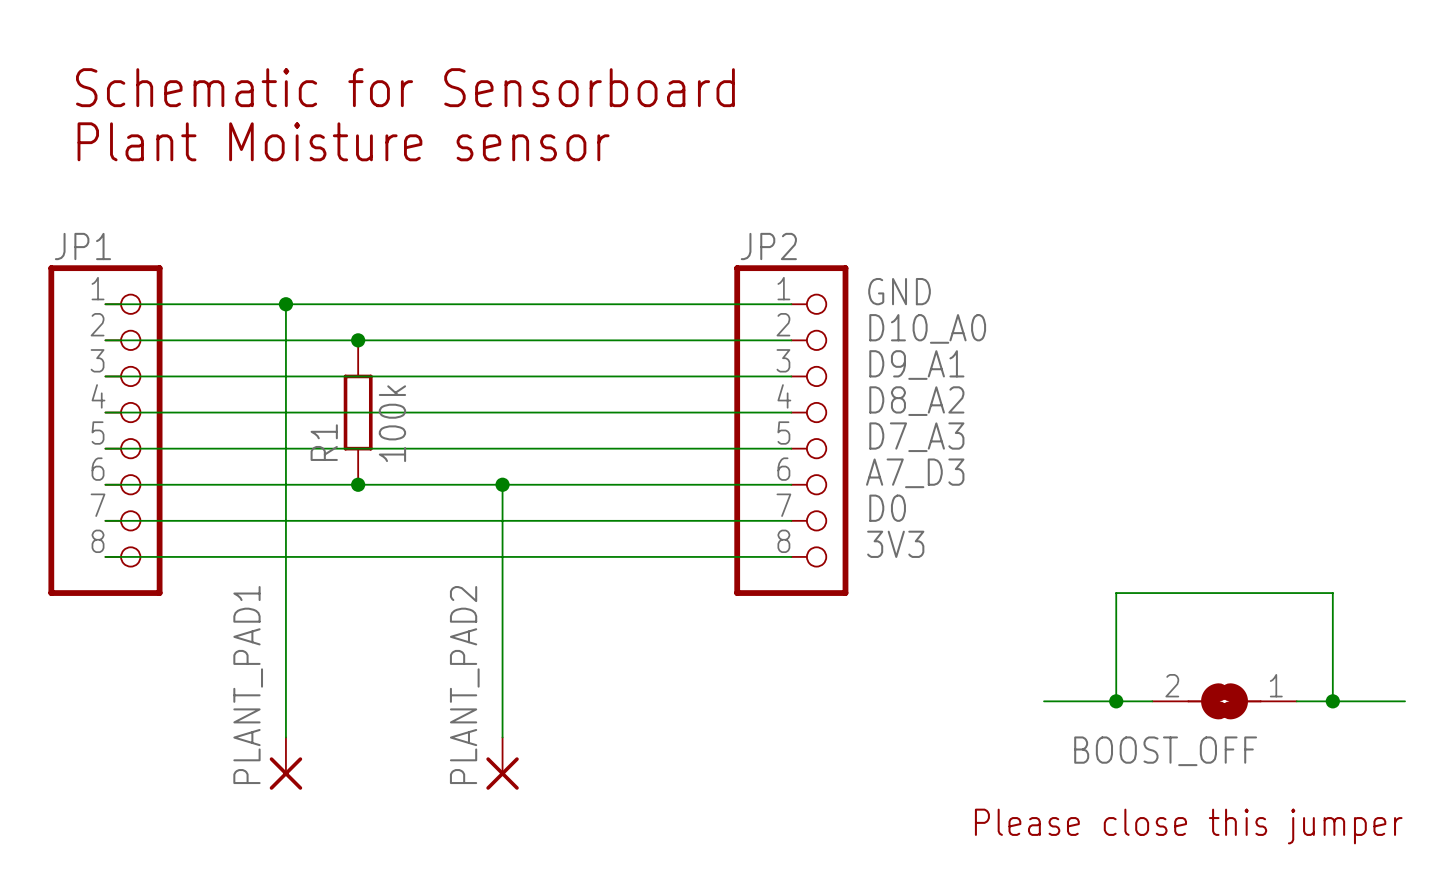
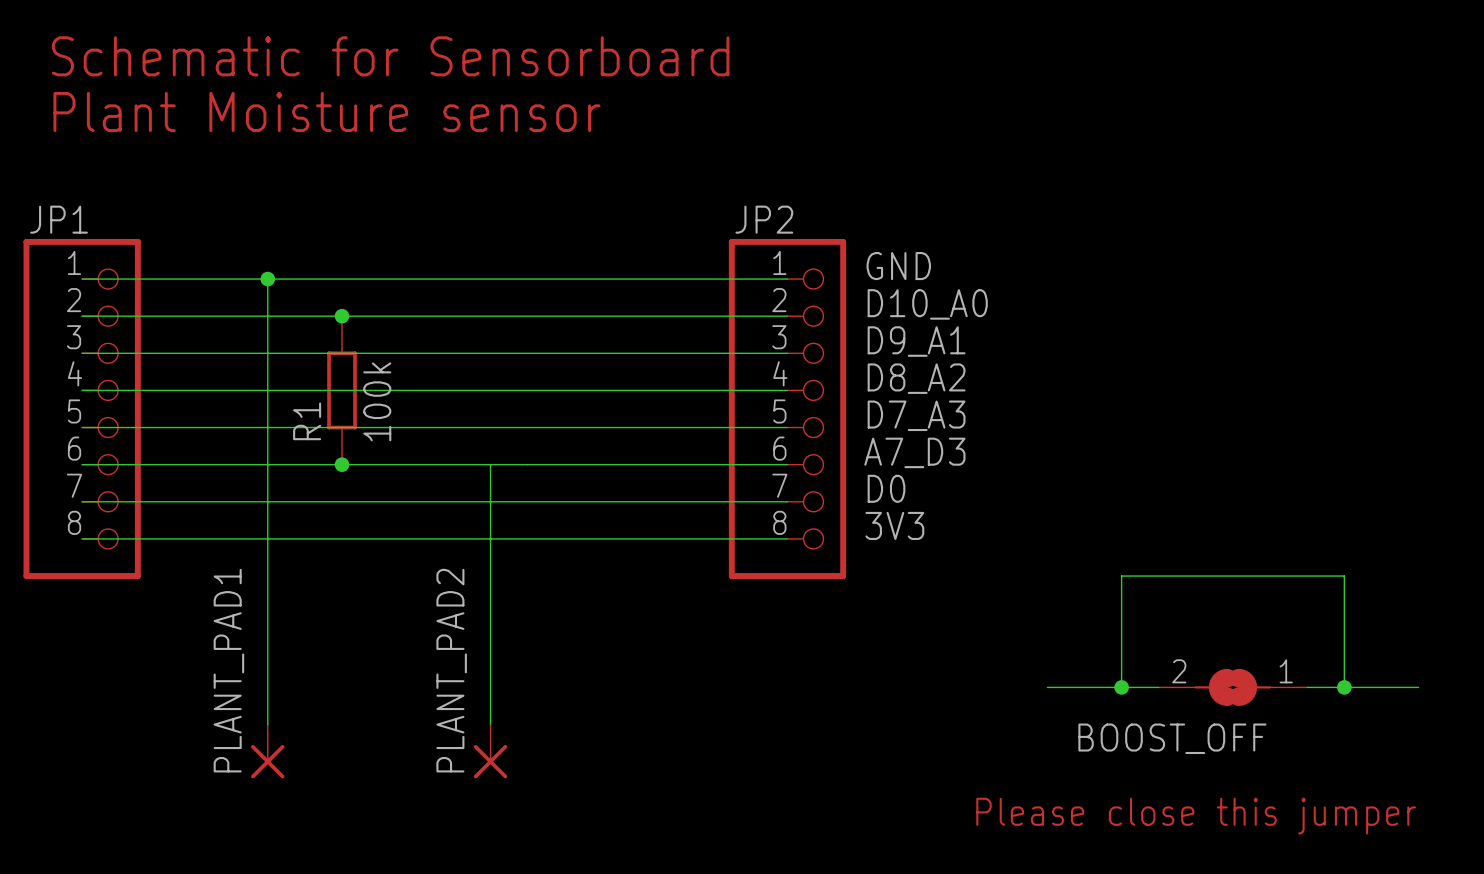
junction: (502, 484) -> none

